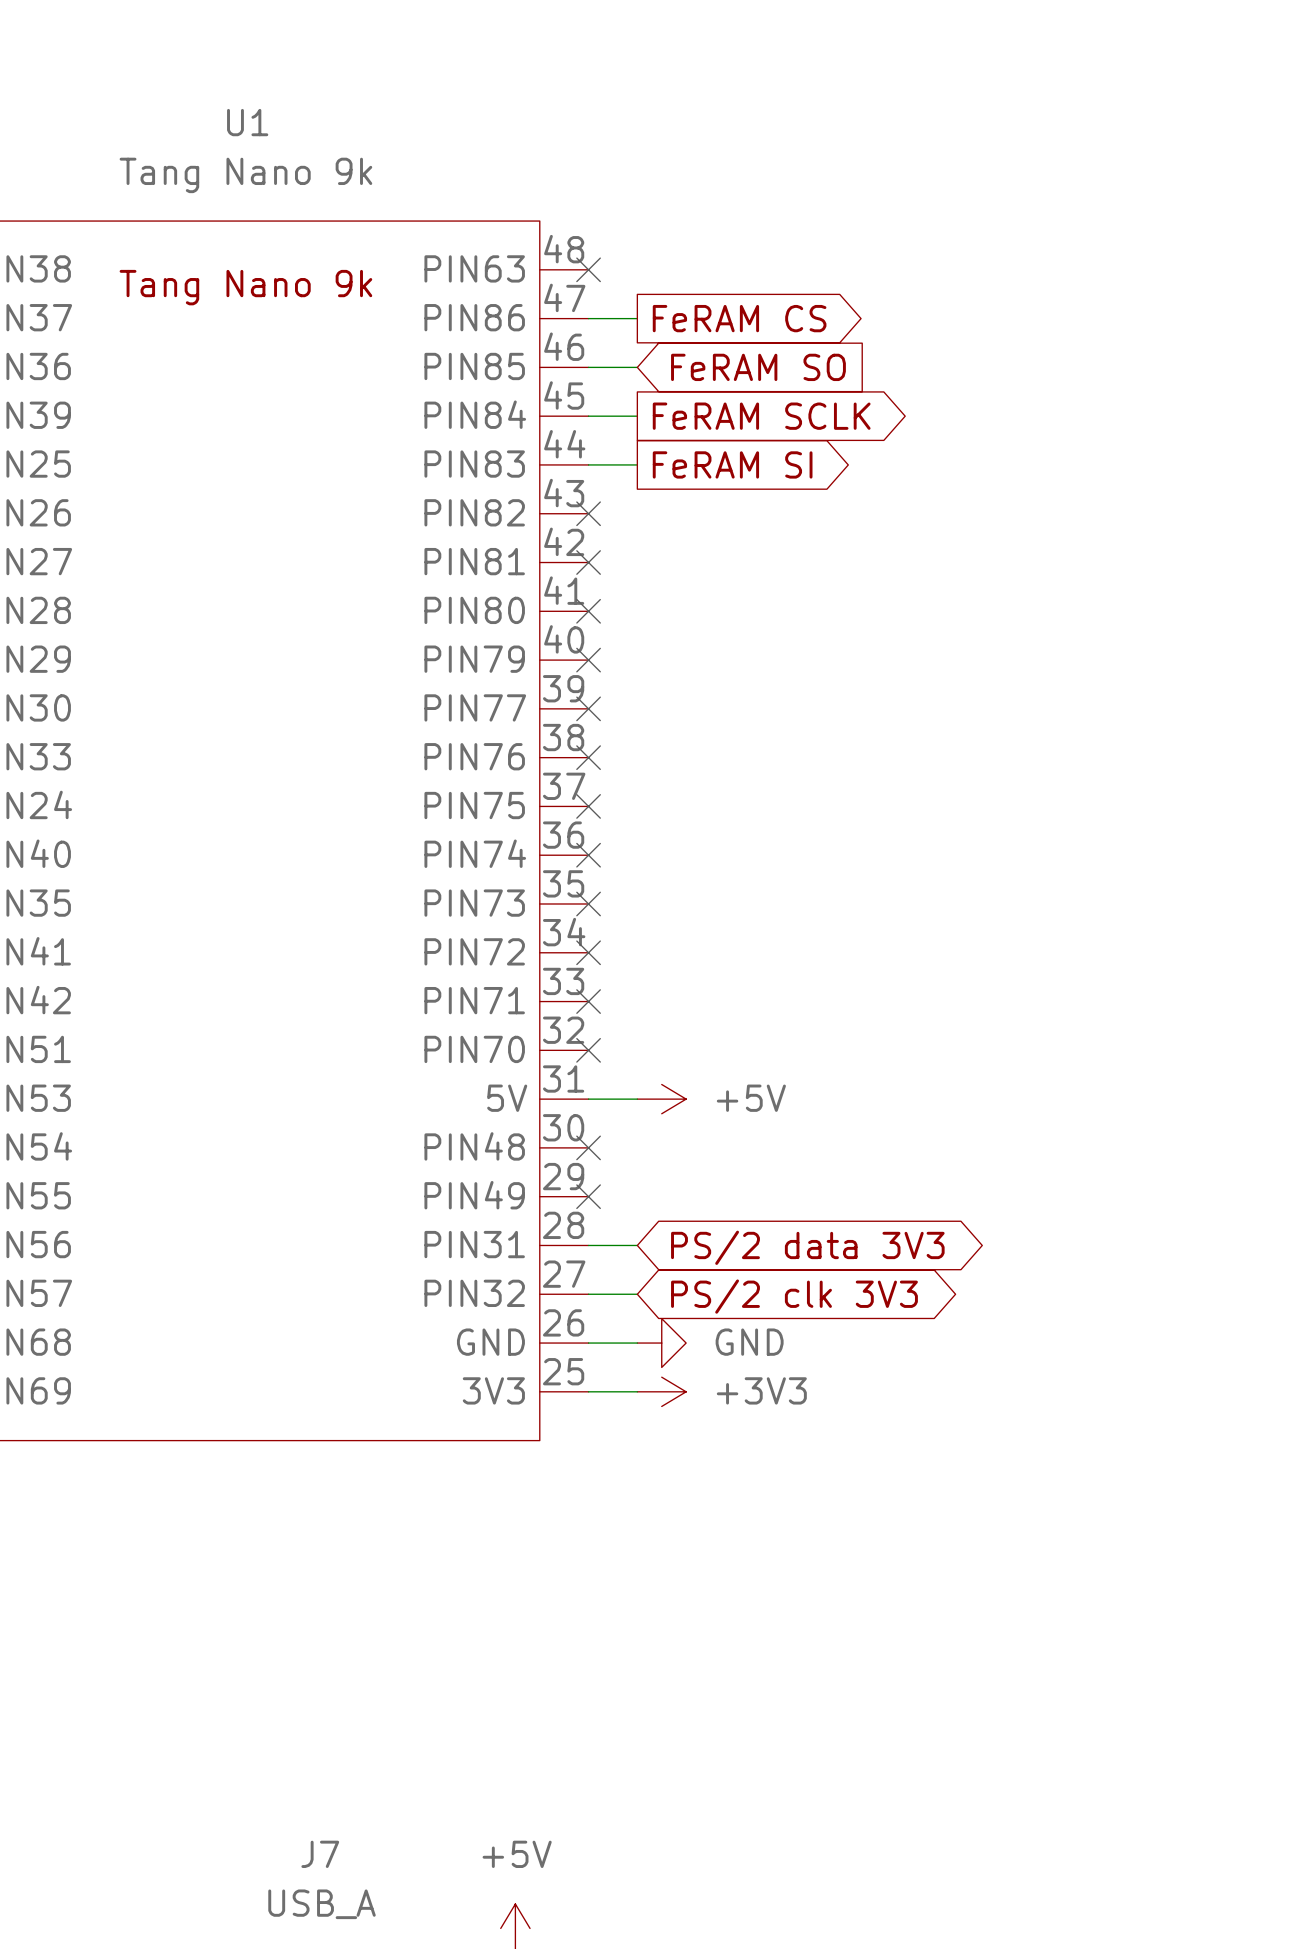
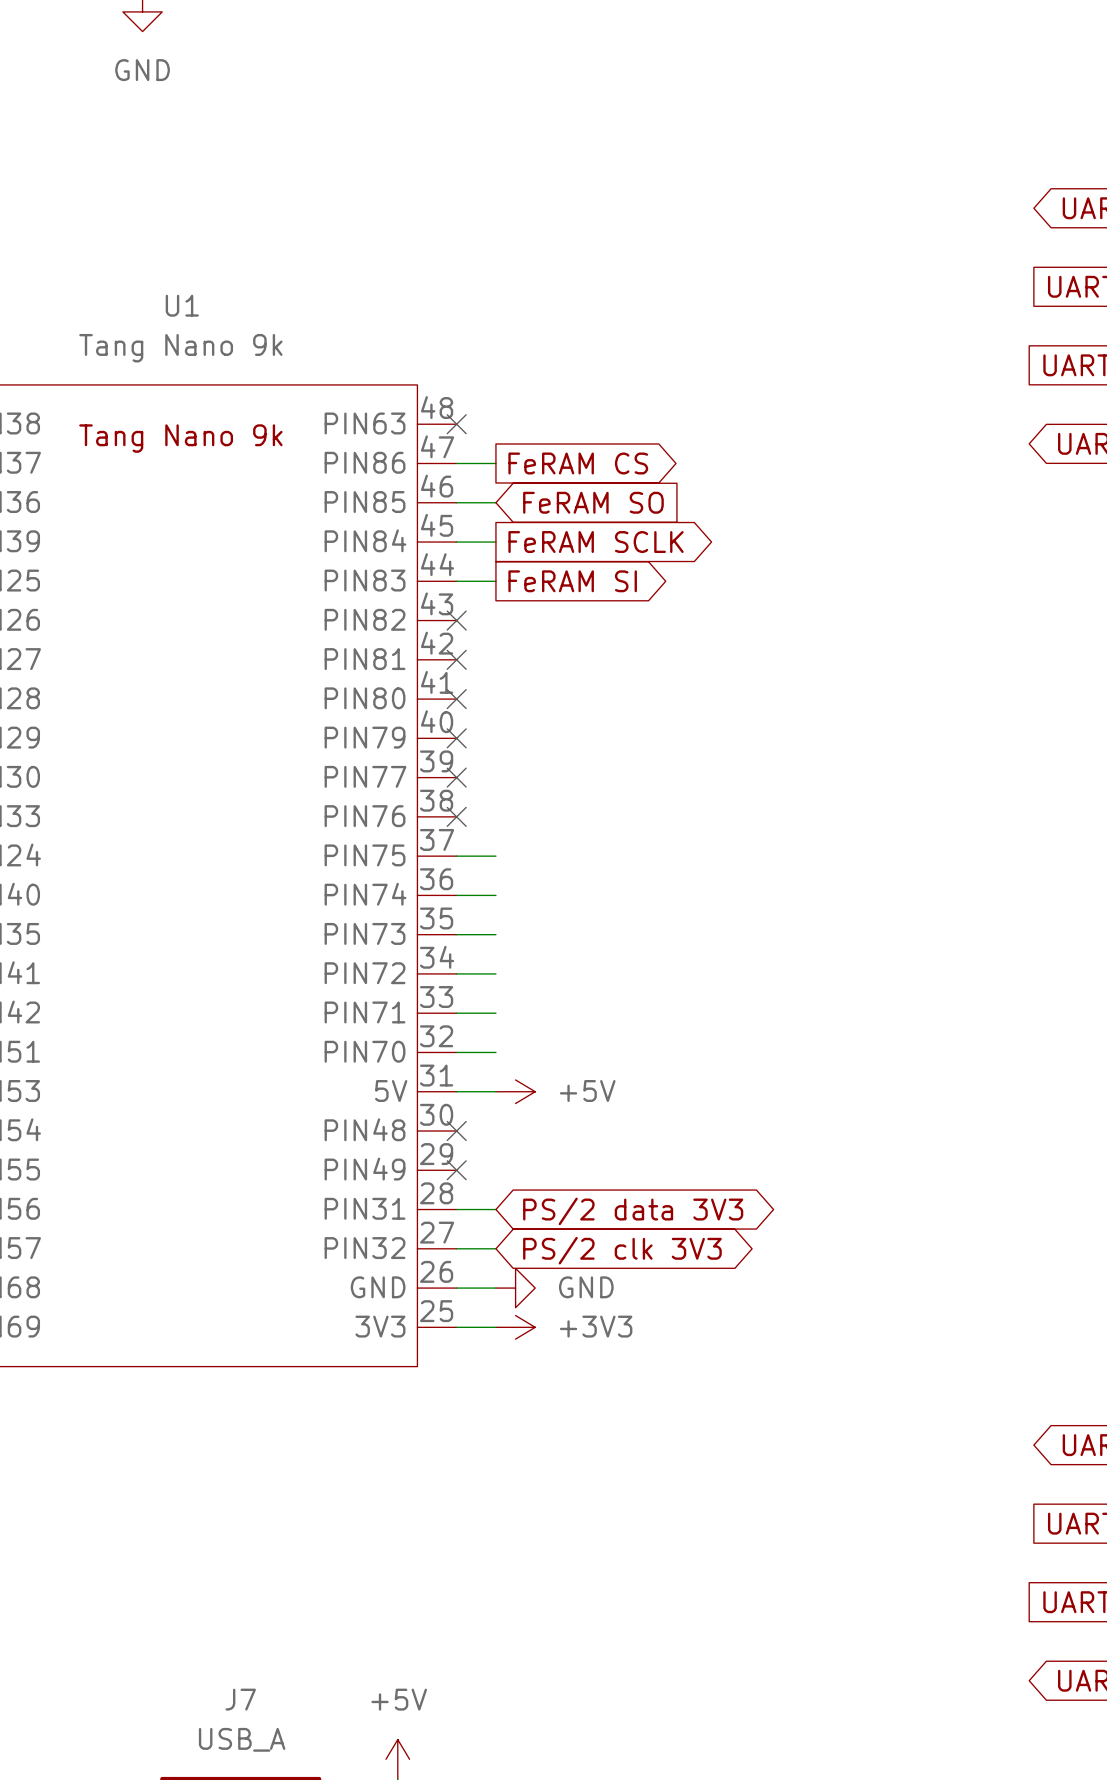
wire: none -> (456, 856) (495, 856)
no-connect mark: (588, 806) -> none
wire: none -> (456, 895) (495, 895)
no-connect mark: (588, 855) -> none
wire: none -> (456, 934) (495, 934)
no-connect mark: (588, 903) -> none
wire: none -> (456, 973) (495, 973)
no-connect mark: (588, 952) -> none
wire: none -> (456, 1013) (495, 1013)
no-connect mark: (588, 1001) -> none
wire: none -> (456, 1052) (495, 1052)
no-connect mark: (588, 1050) -> none

